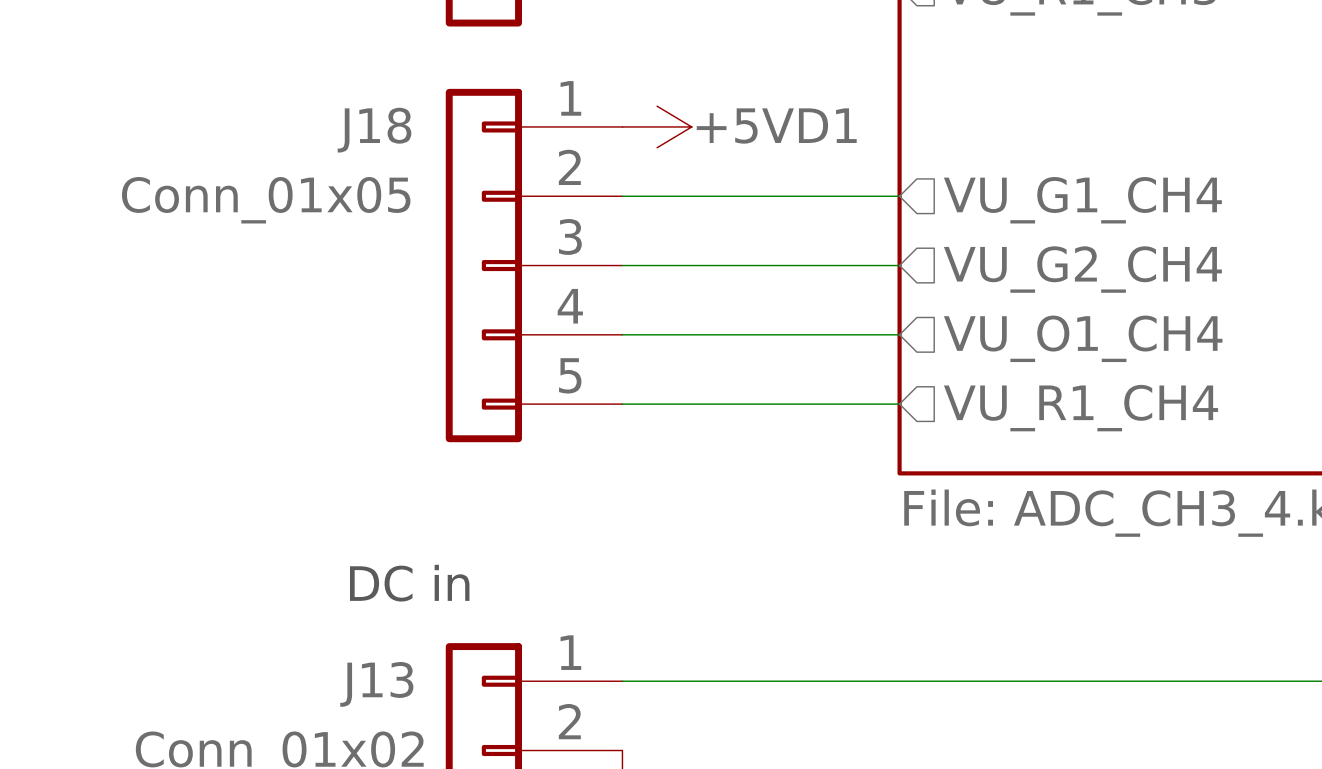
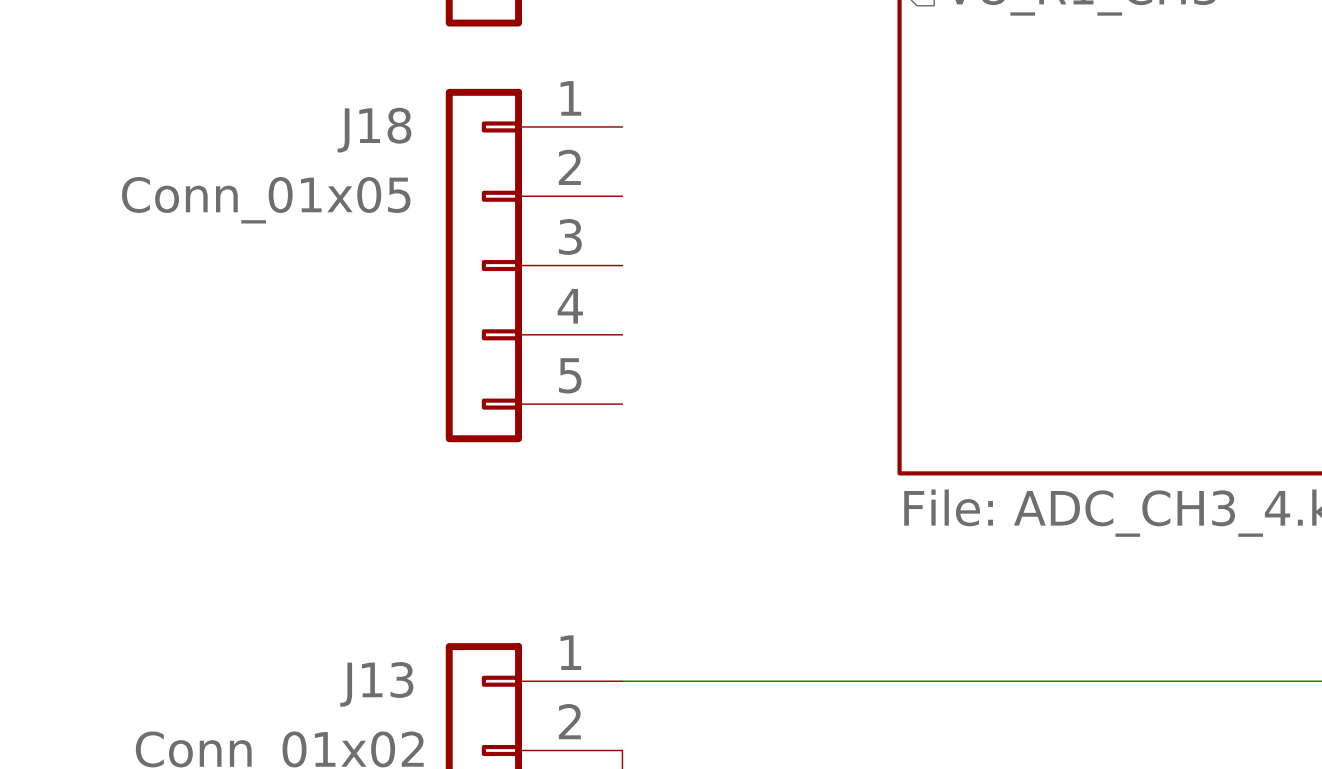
power symbol: +5VD1 (657, 126) -> none
wire: (622, 196) (899, 196) -> none
sheet pin: VU_G1_CH4 (1082, 200) -> none
wire: (622, 265) (899, 265) -> none
sheet pin: VU_G2_CH4 (1082, 269) -> none
wire: (622, 334) (899, 334) -> none
sheet pin: VU_O1_CH4 (1083, 338) -> none
wire: (622, 404) (899, 404) -> none
sheet pin: VU_R1_CH4 (1081, 408) -> none
text: DC in (409, 583) -> none

